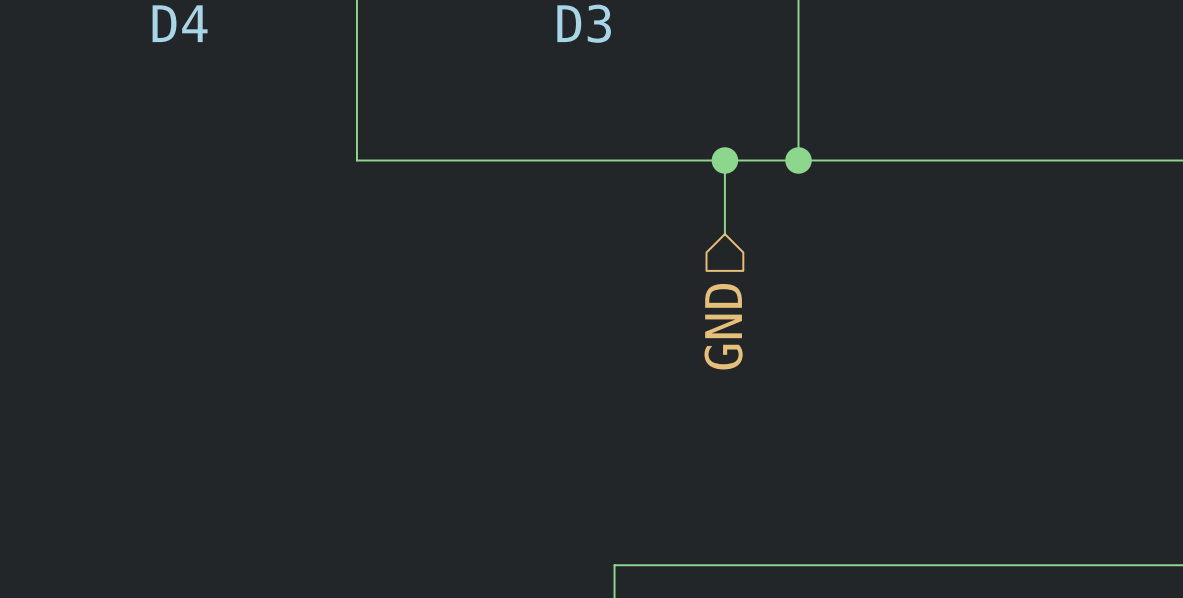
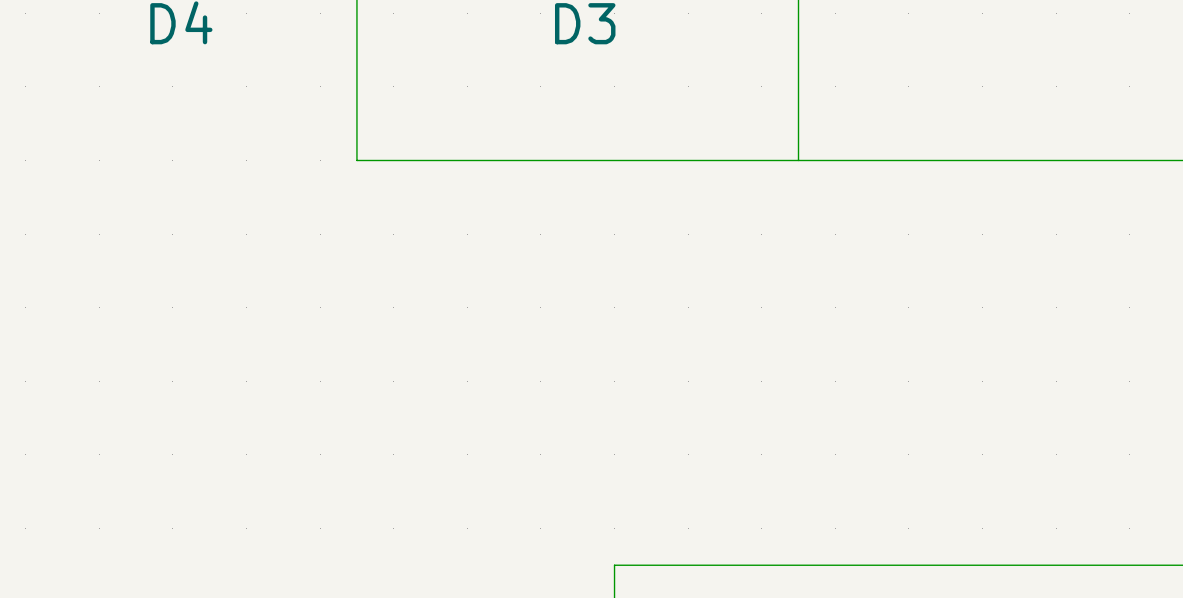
wire: (724, 160) (724, 234) -> none
junction: (724, 160) -> none
junction: (798, 160) -> none
hierarchical label: GND (723, 326) -> none

